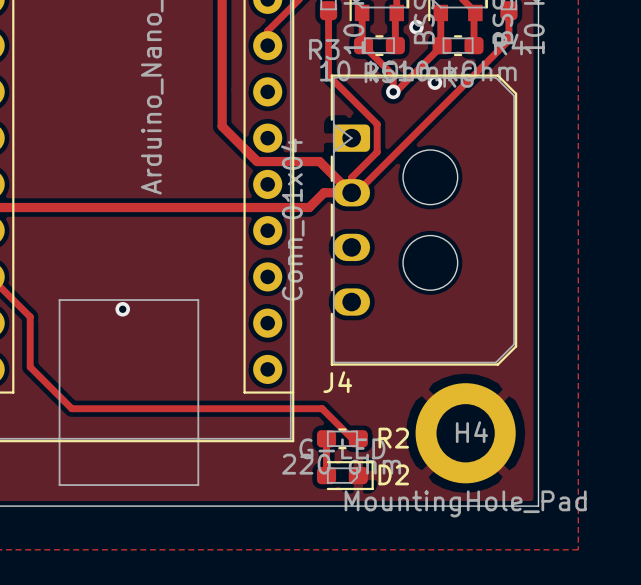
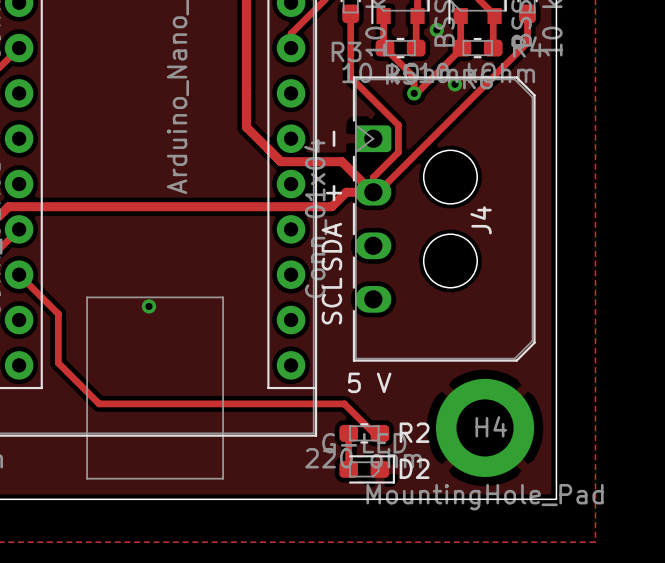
text: none -> - (334, 138)
text: none -> + (334, 193)
text: none -> SDA (331, 246)
text: none -> SCL (331, 301)
J4 name rotation: 0° (337, 382) -> 90° counterclockwise (481, 220)
J4 name position: J4 (337, 382) -> J4 (481, 220)
text: none -> 5 V (369, 382)

